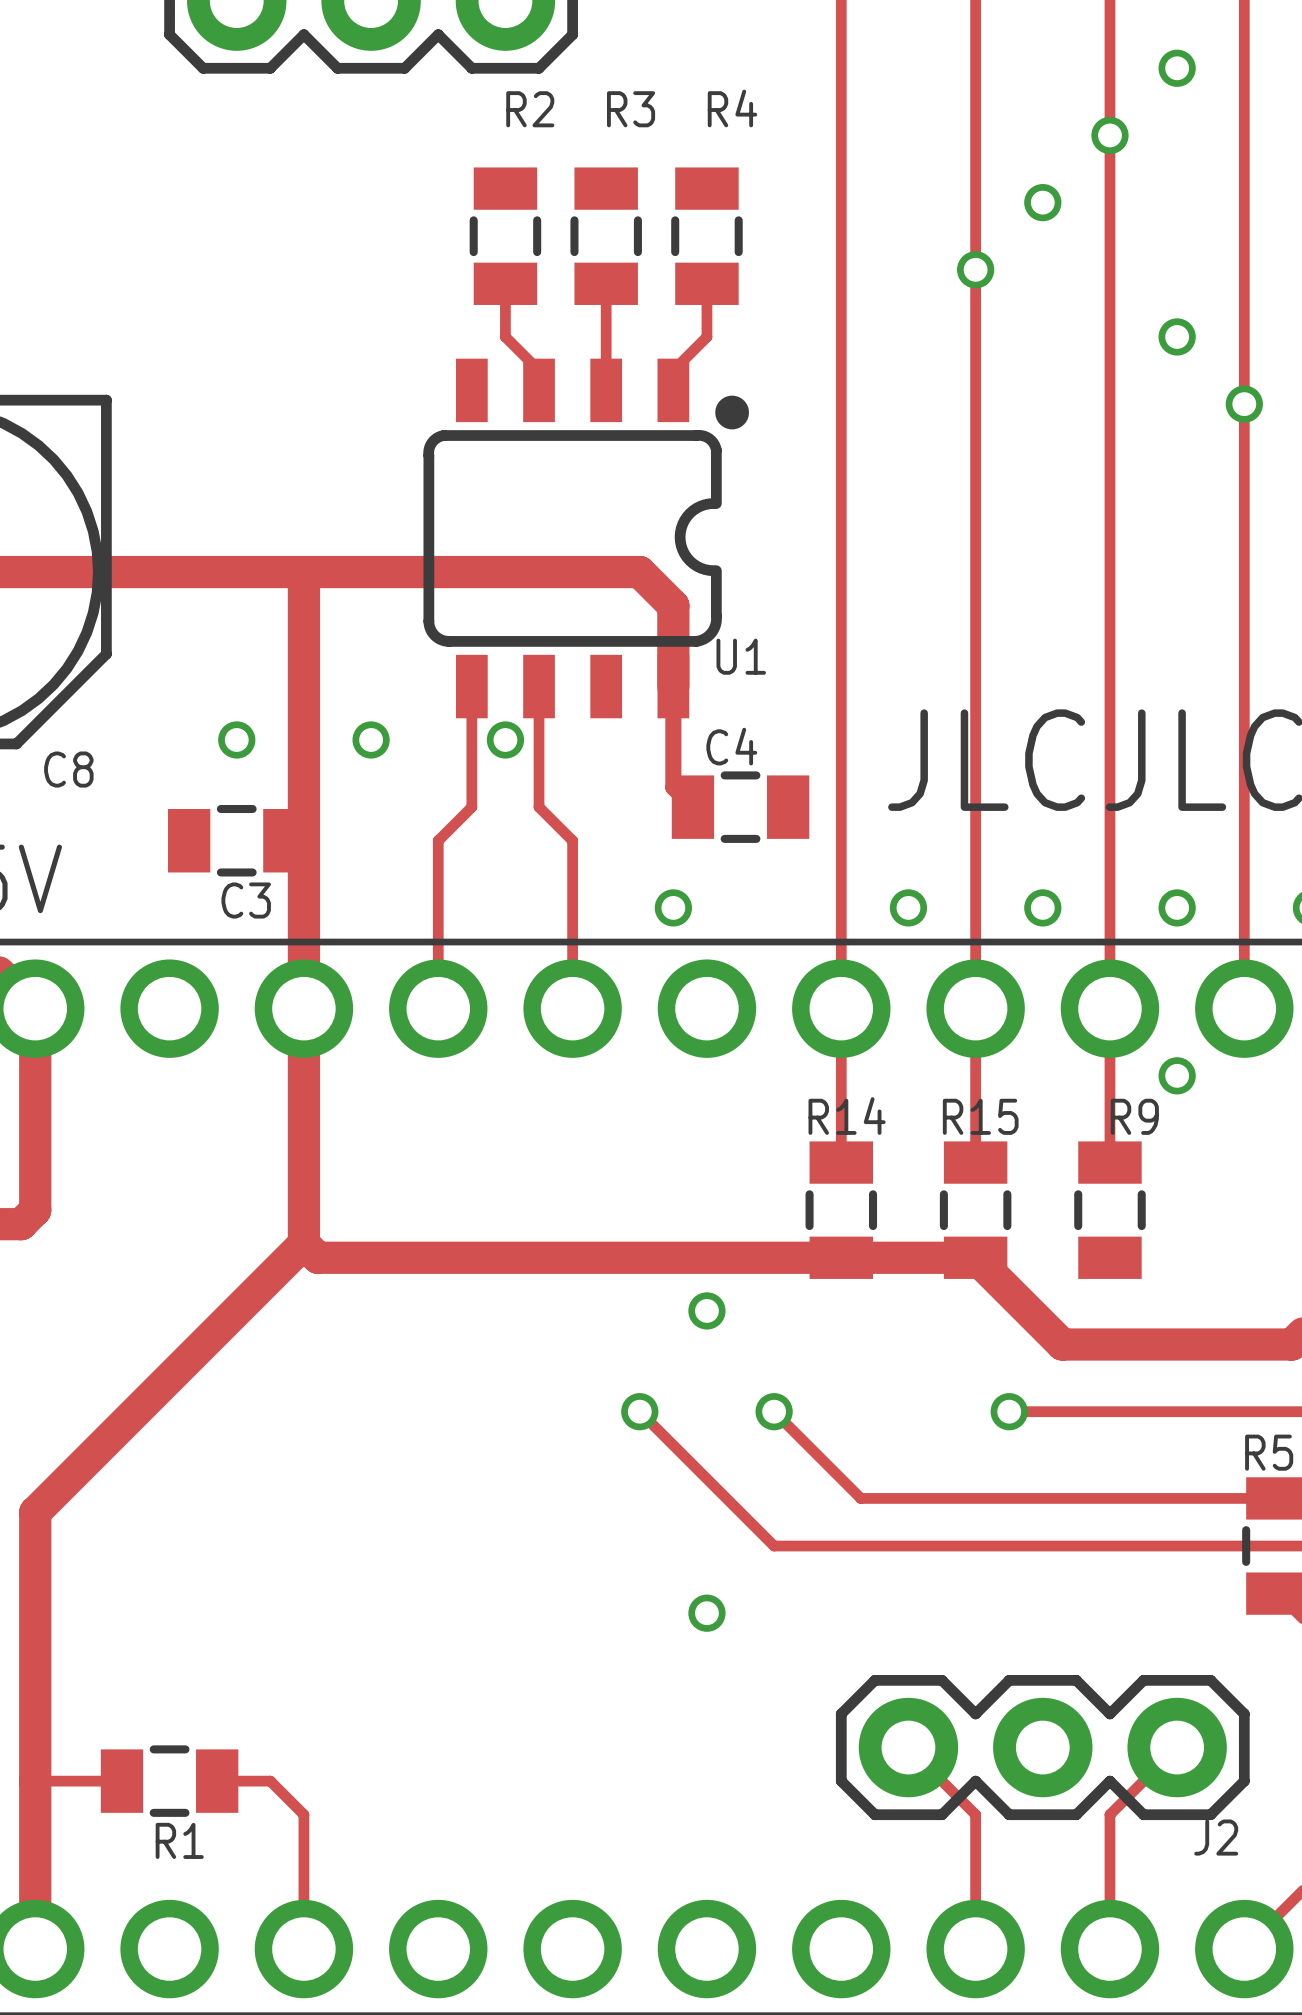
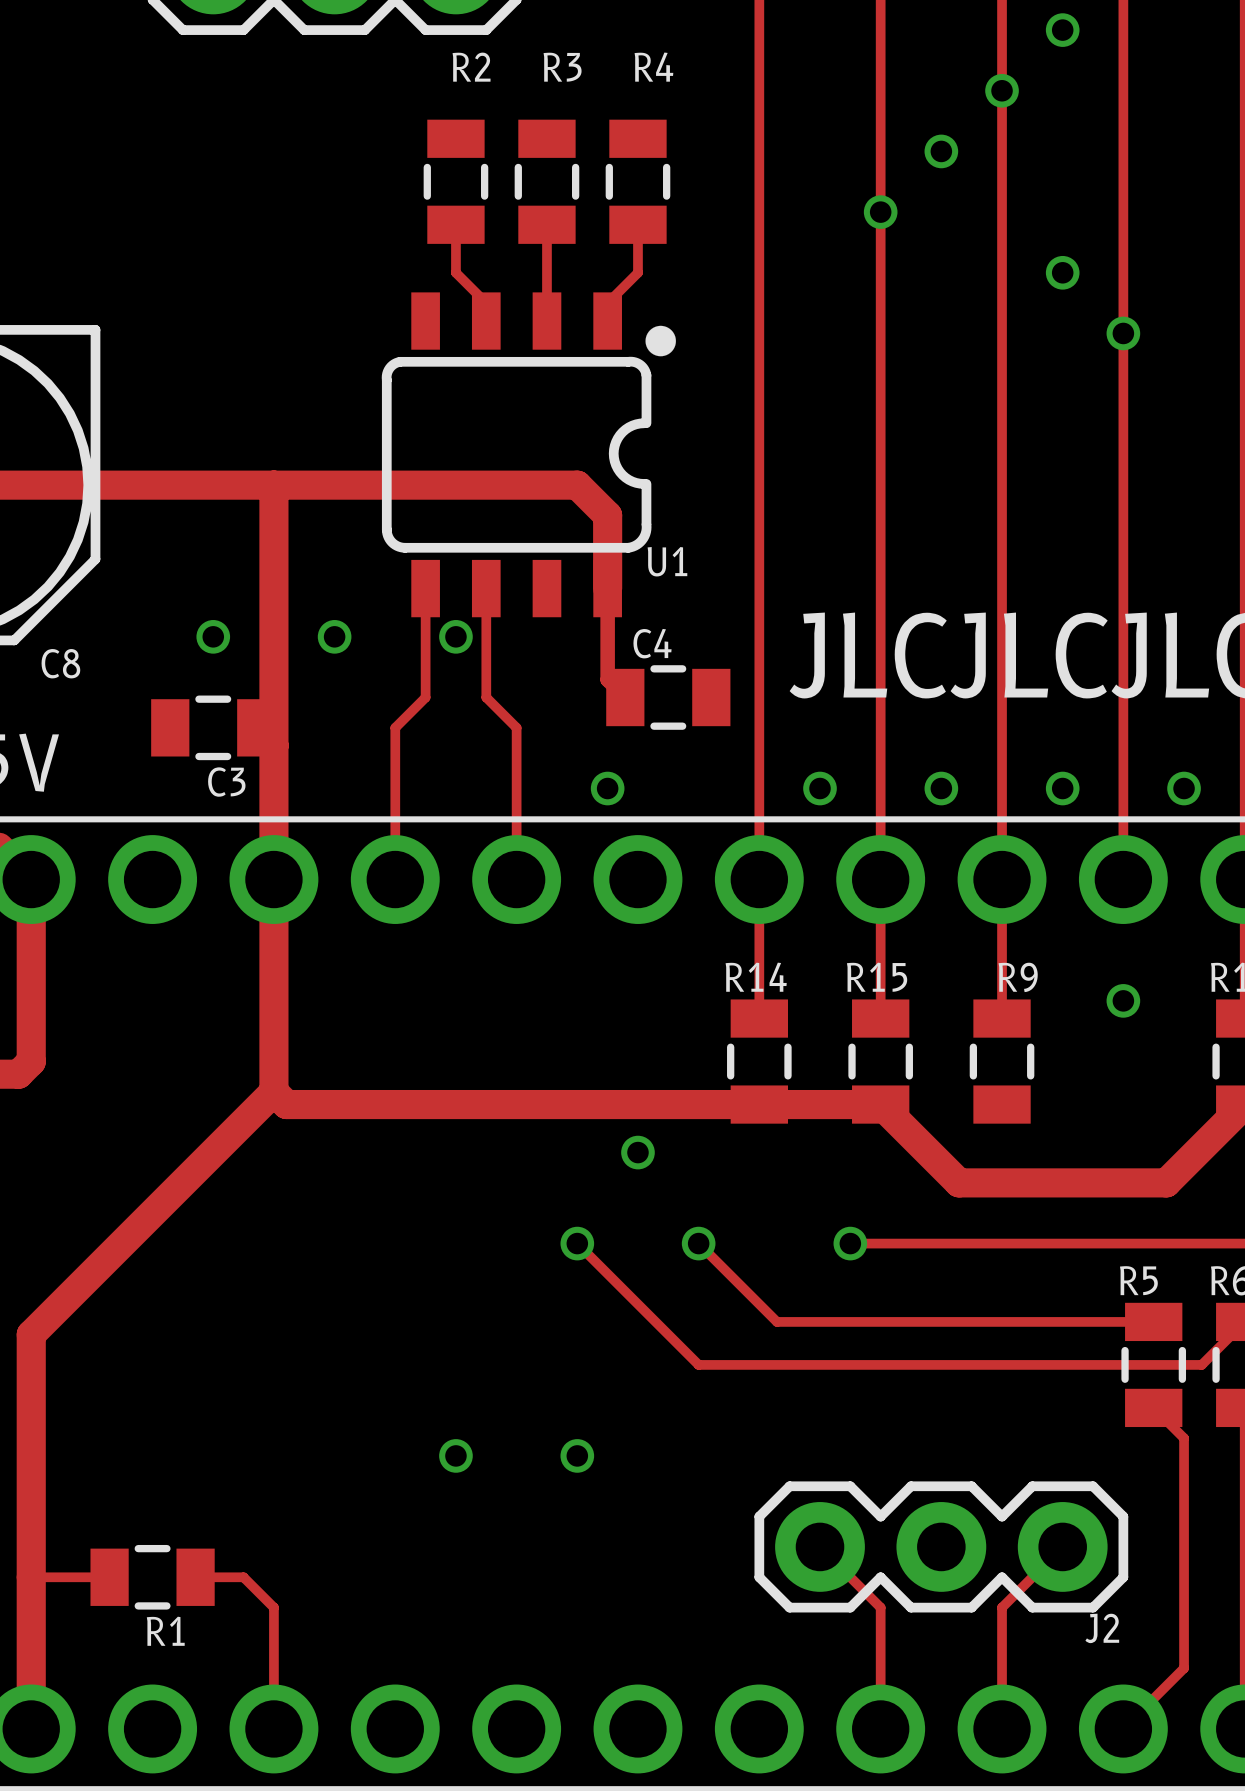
via position: (1177, 1075) -> (1123, 1000)
track: none -> (850, 1243) (911, 1243)
via position: (1009, 1411) -> (850, 1243)
via position: (706, 1613) -> (577, 1455)
via: none -> (455, 1455)

